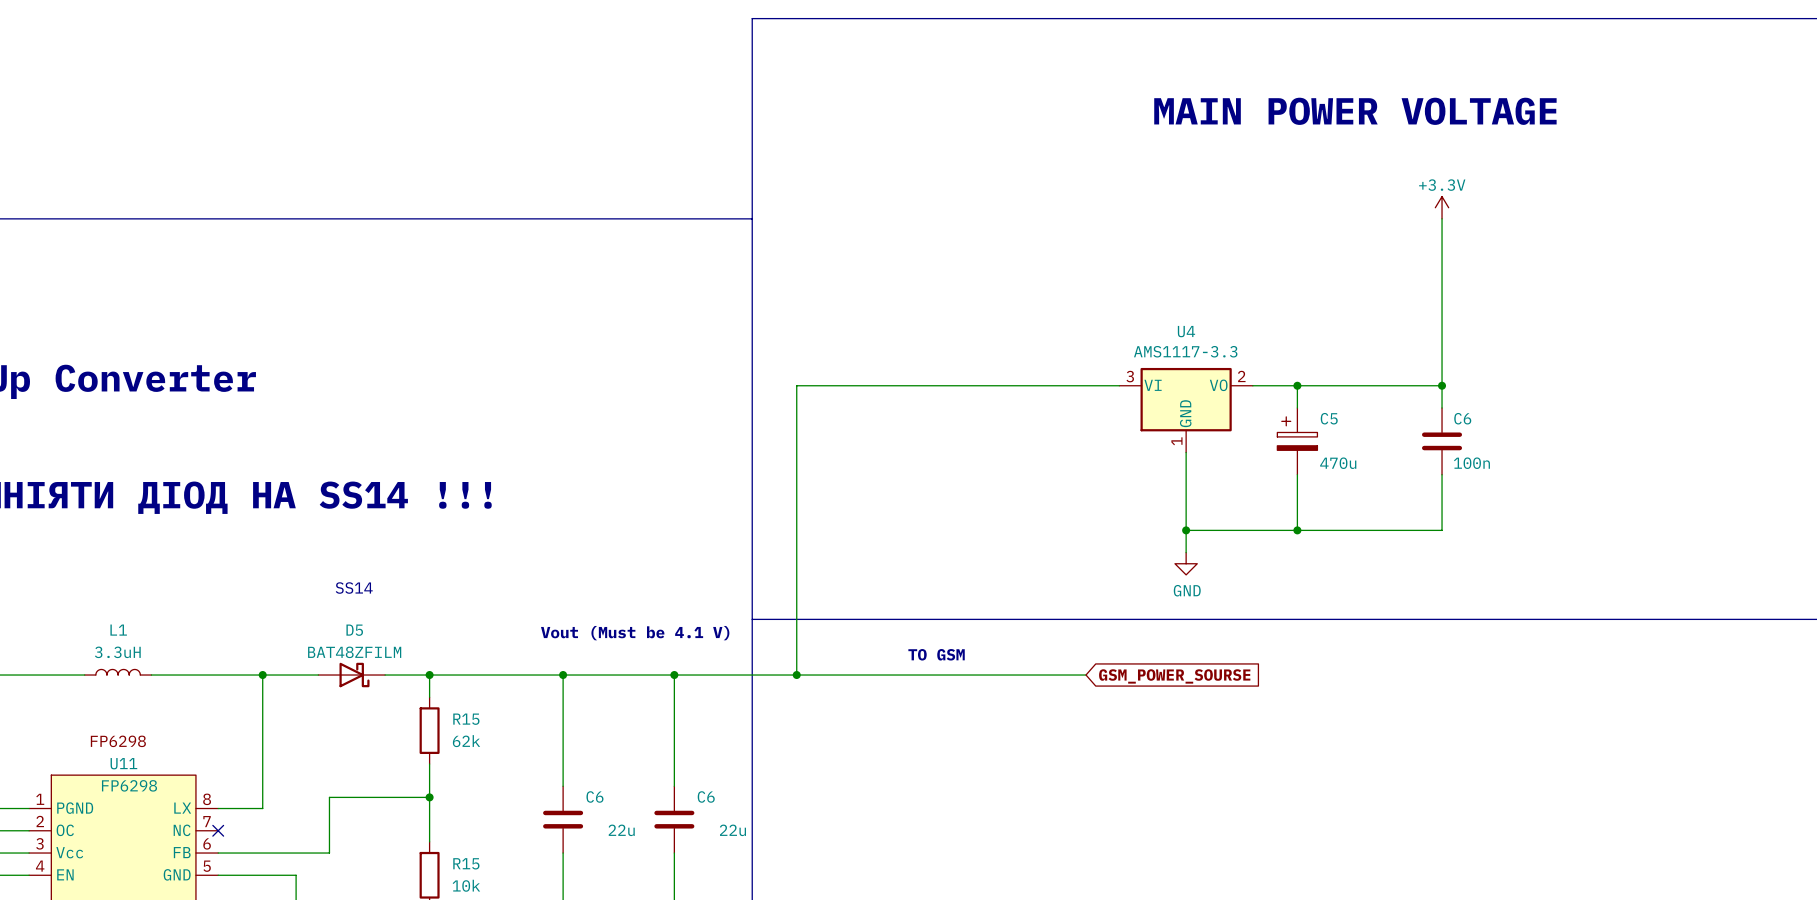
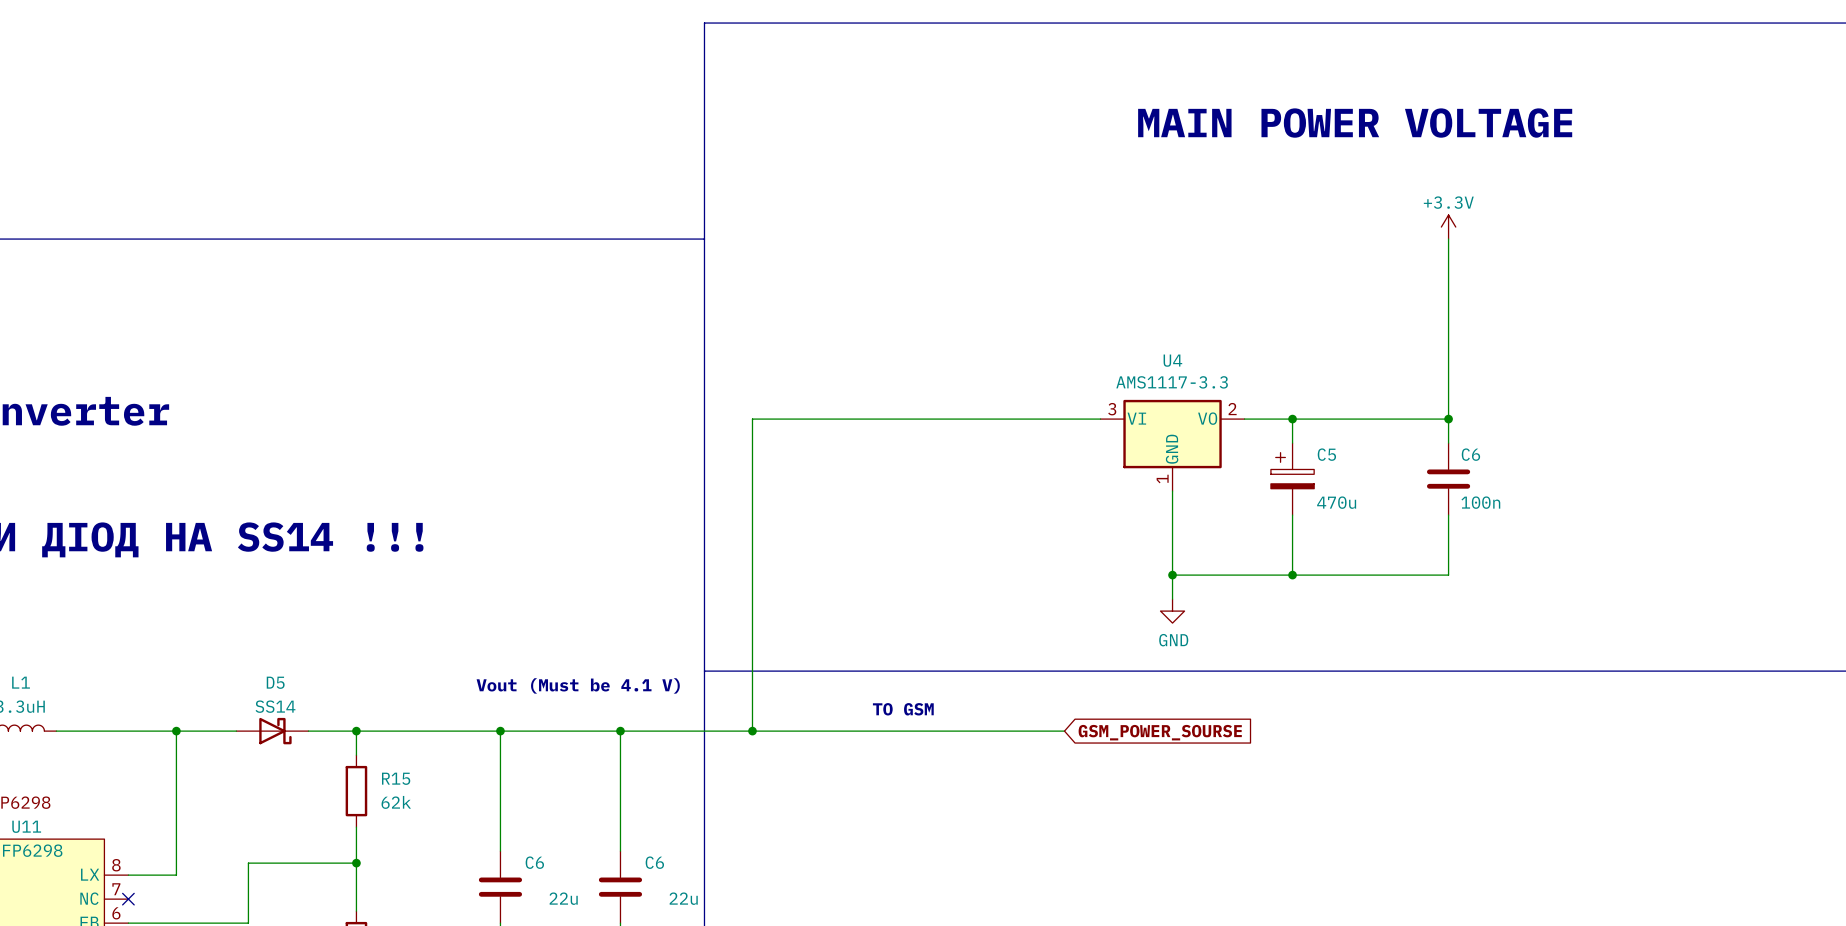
text: SS14 (354, 588) -> none
D5 value: BAT48ZFILM (354, 652) -> SS14 (275, 706)

